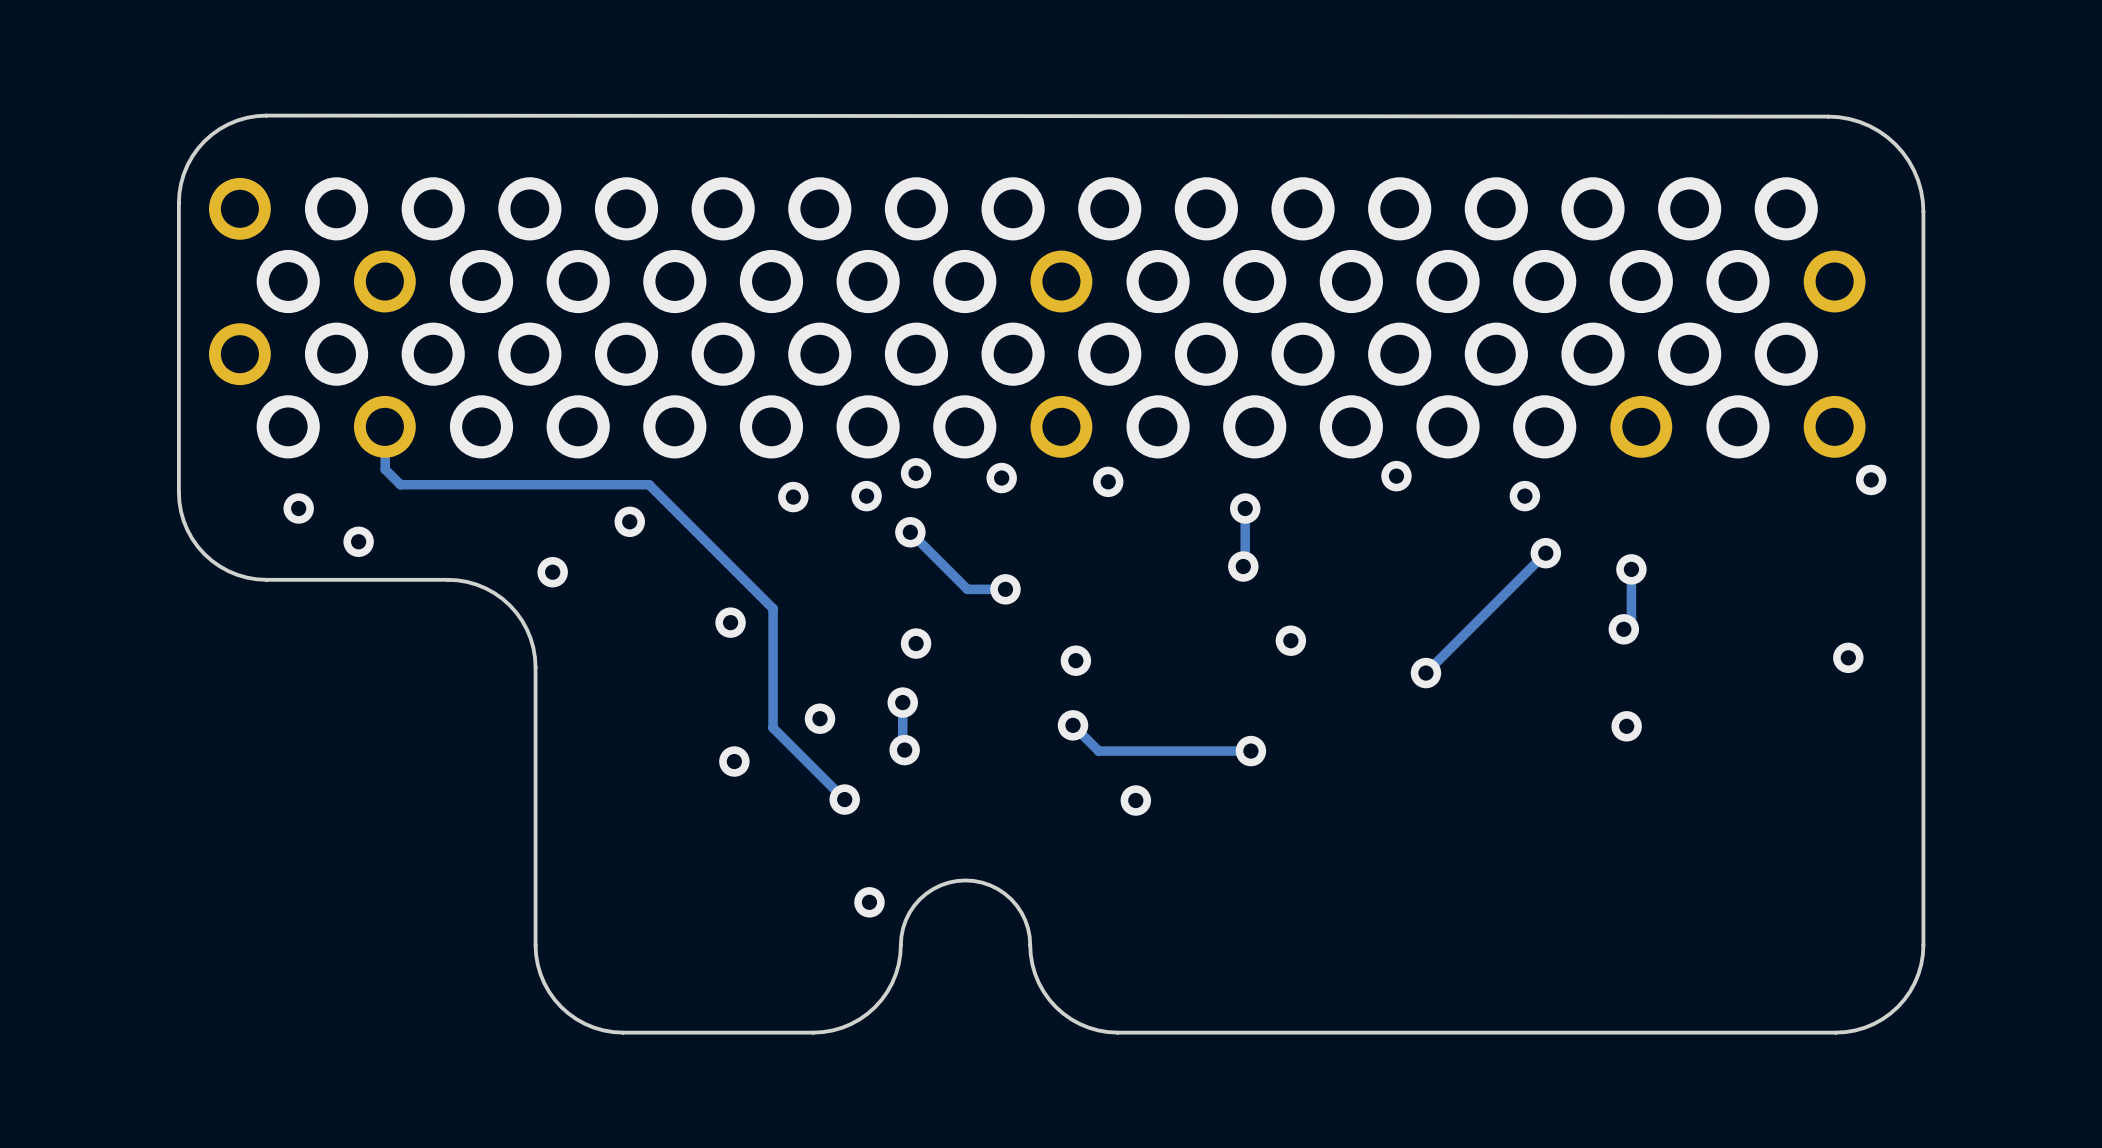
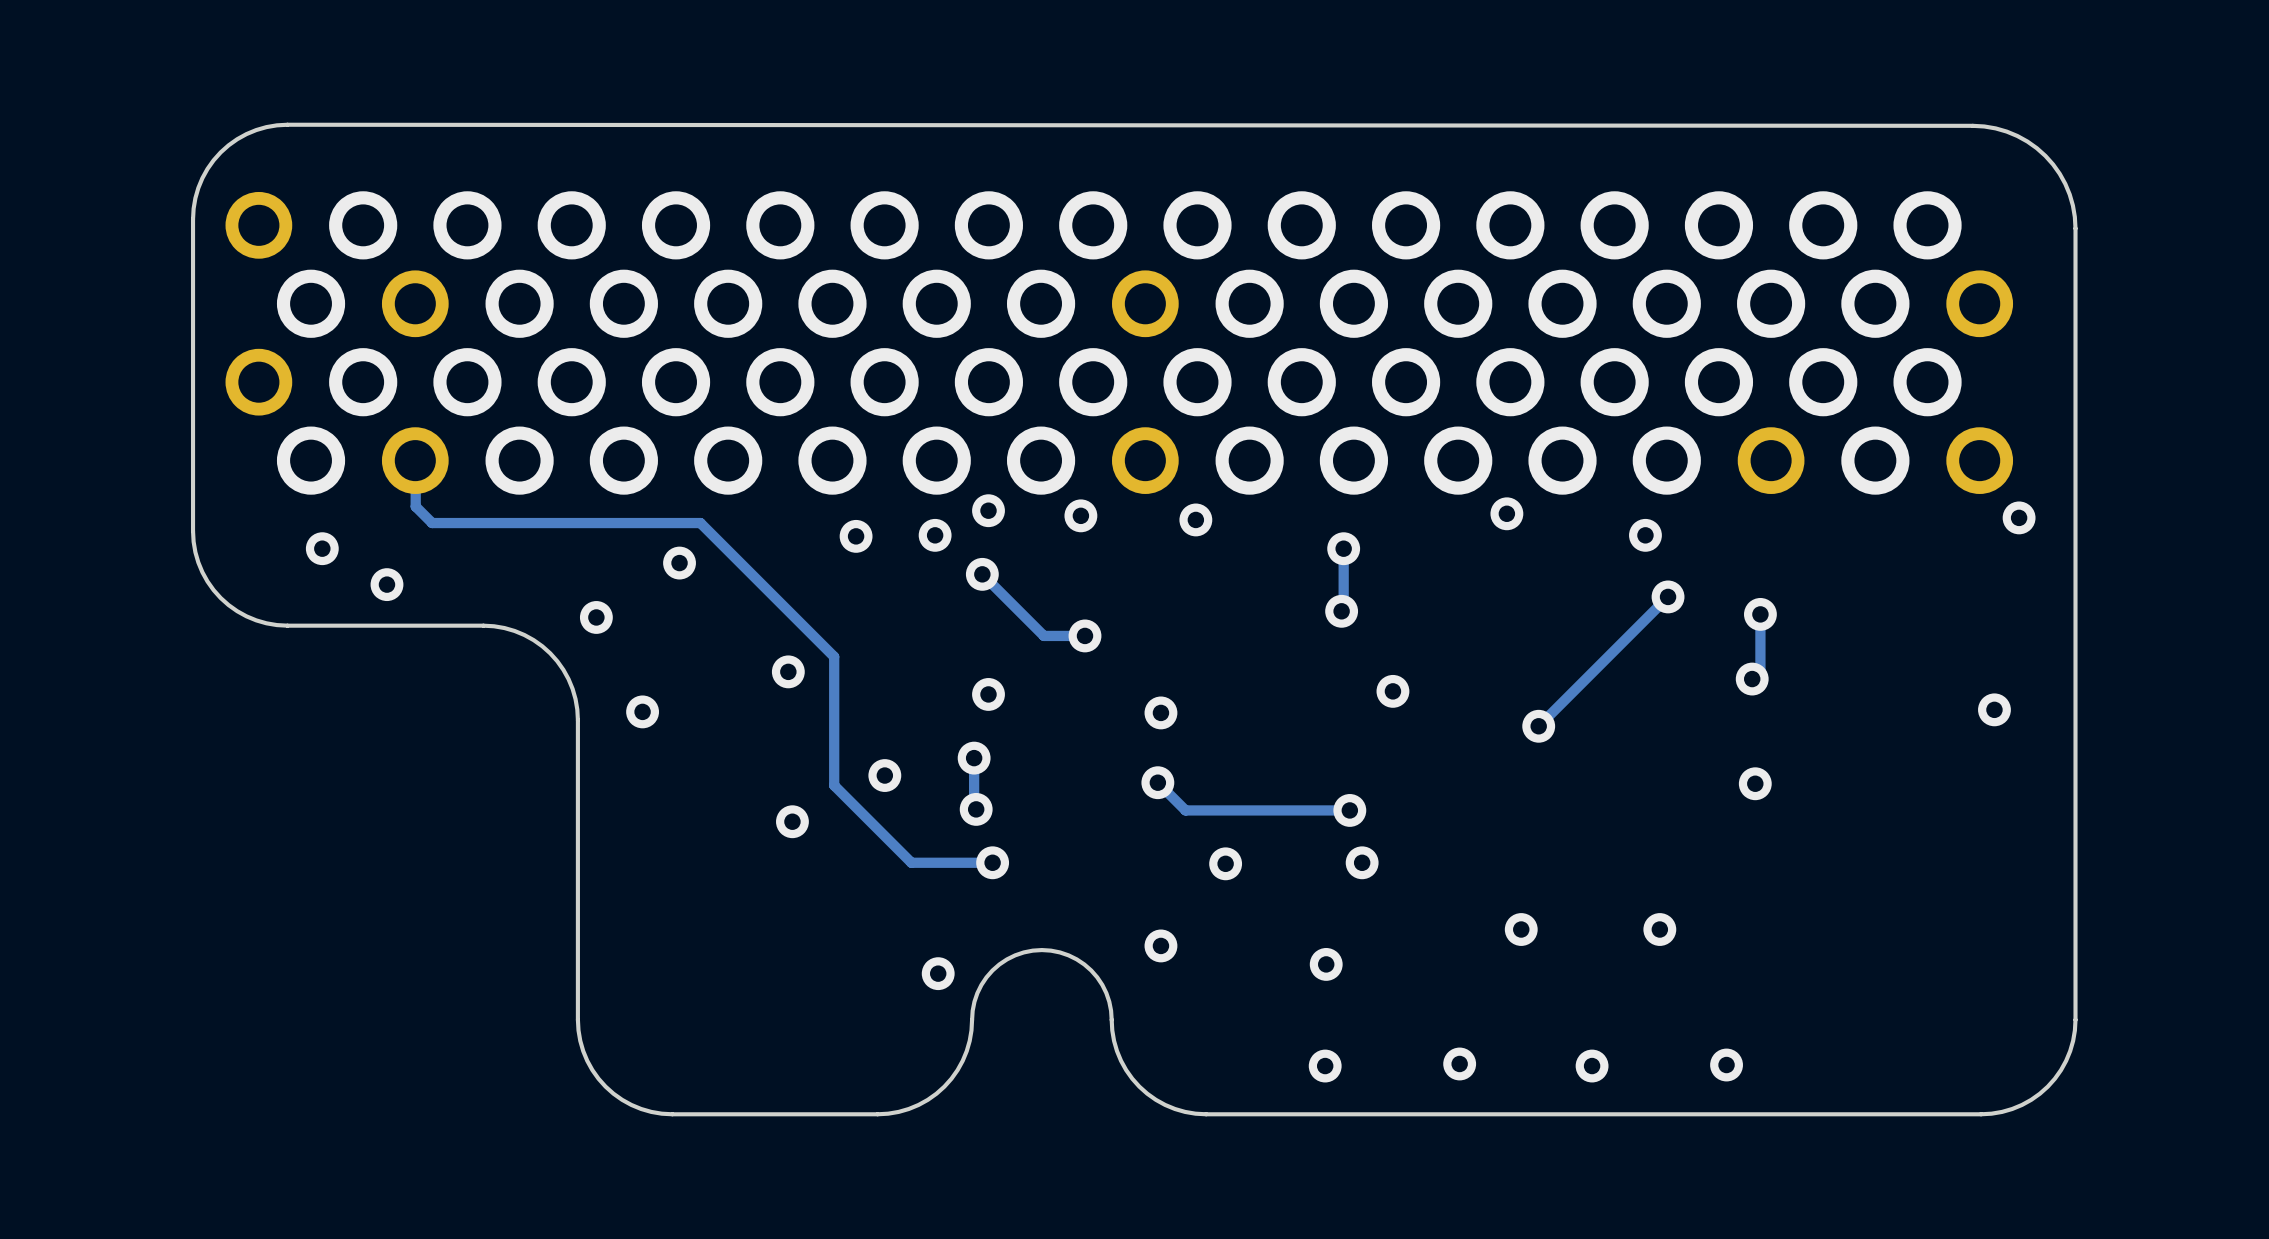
via: none -> (642, 711)
via position: (844, 799) -> (992, 862)
track: none -> (992, 862) (911, 862)
via: none -> (1362, 862)
via: none -> (1521, 929)
via: none -> (1659, 929)
via: none -> (1160, 945)
via: none -> (1326, 964)
via: none -> (1459, 1063)
via: none -> (1726, 1065)
via: none -> (1325, 1066)
via: none -> (1592, 1066)

